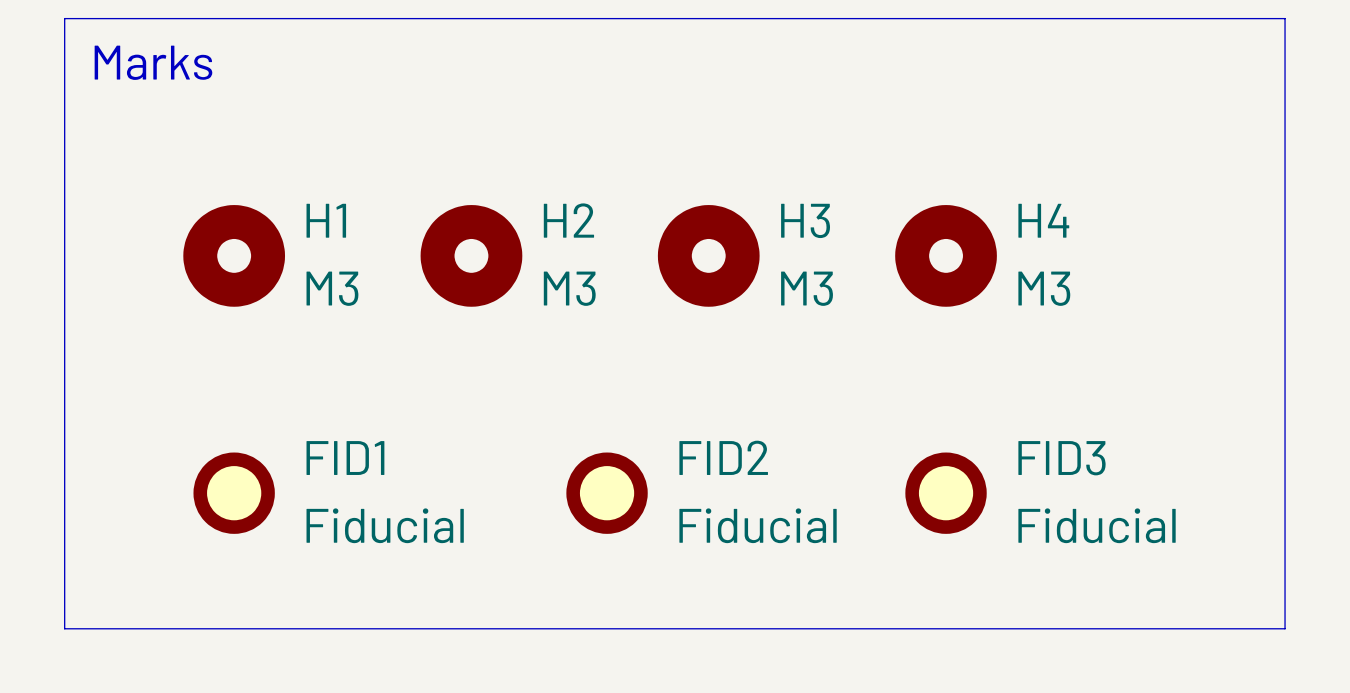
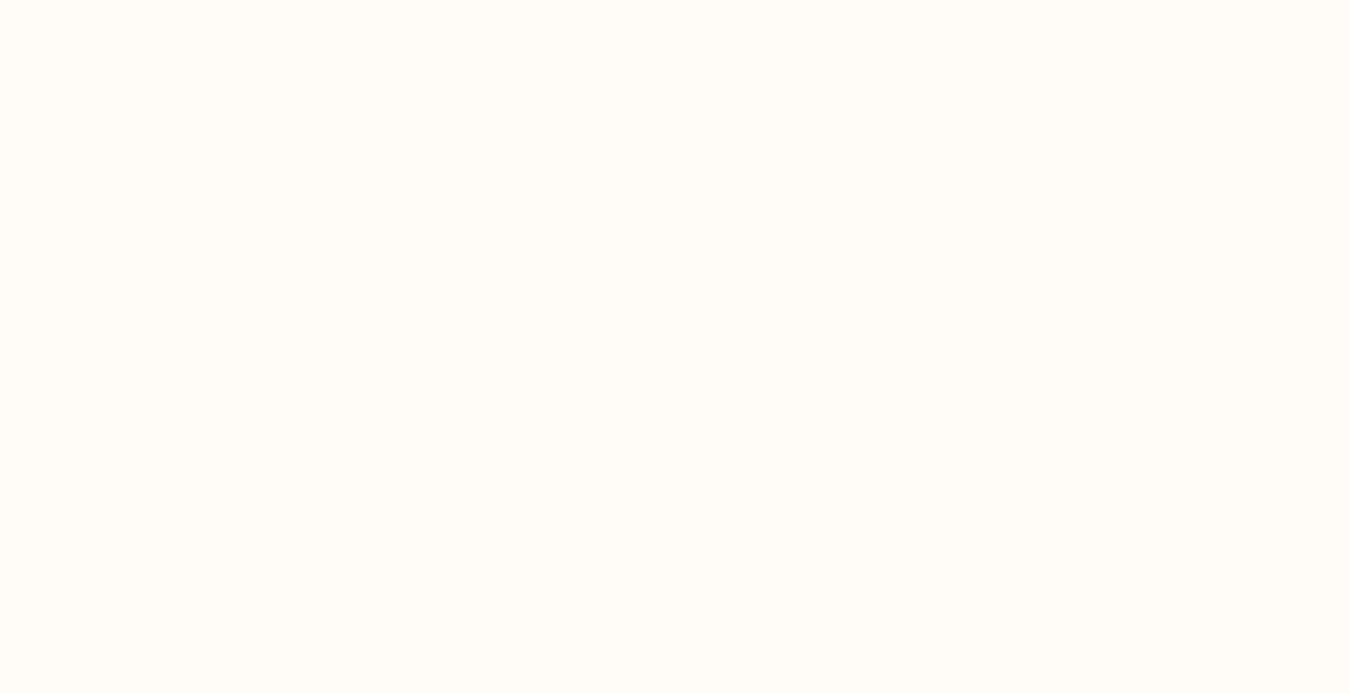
line: (64, 18) (64, 628) (1285, 628) (1285, 18) (64, 18) -> none
text: Marks (153, 62) -> none
H1: M3 (234, 255) -> none
H2: M3 (471, 255) -> none
H3: M3 (708, 255) -> none
H4: M3 (946, 255) -> none
FID1: Fiducial (234, 493) -> none
FID2: Fiducial (607, 493) -> none
FID3: Fiducial (946, 493) -> none

